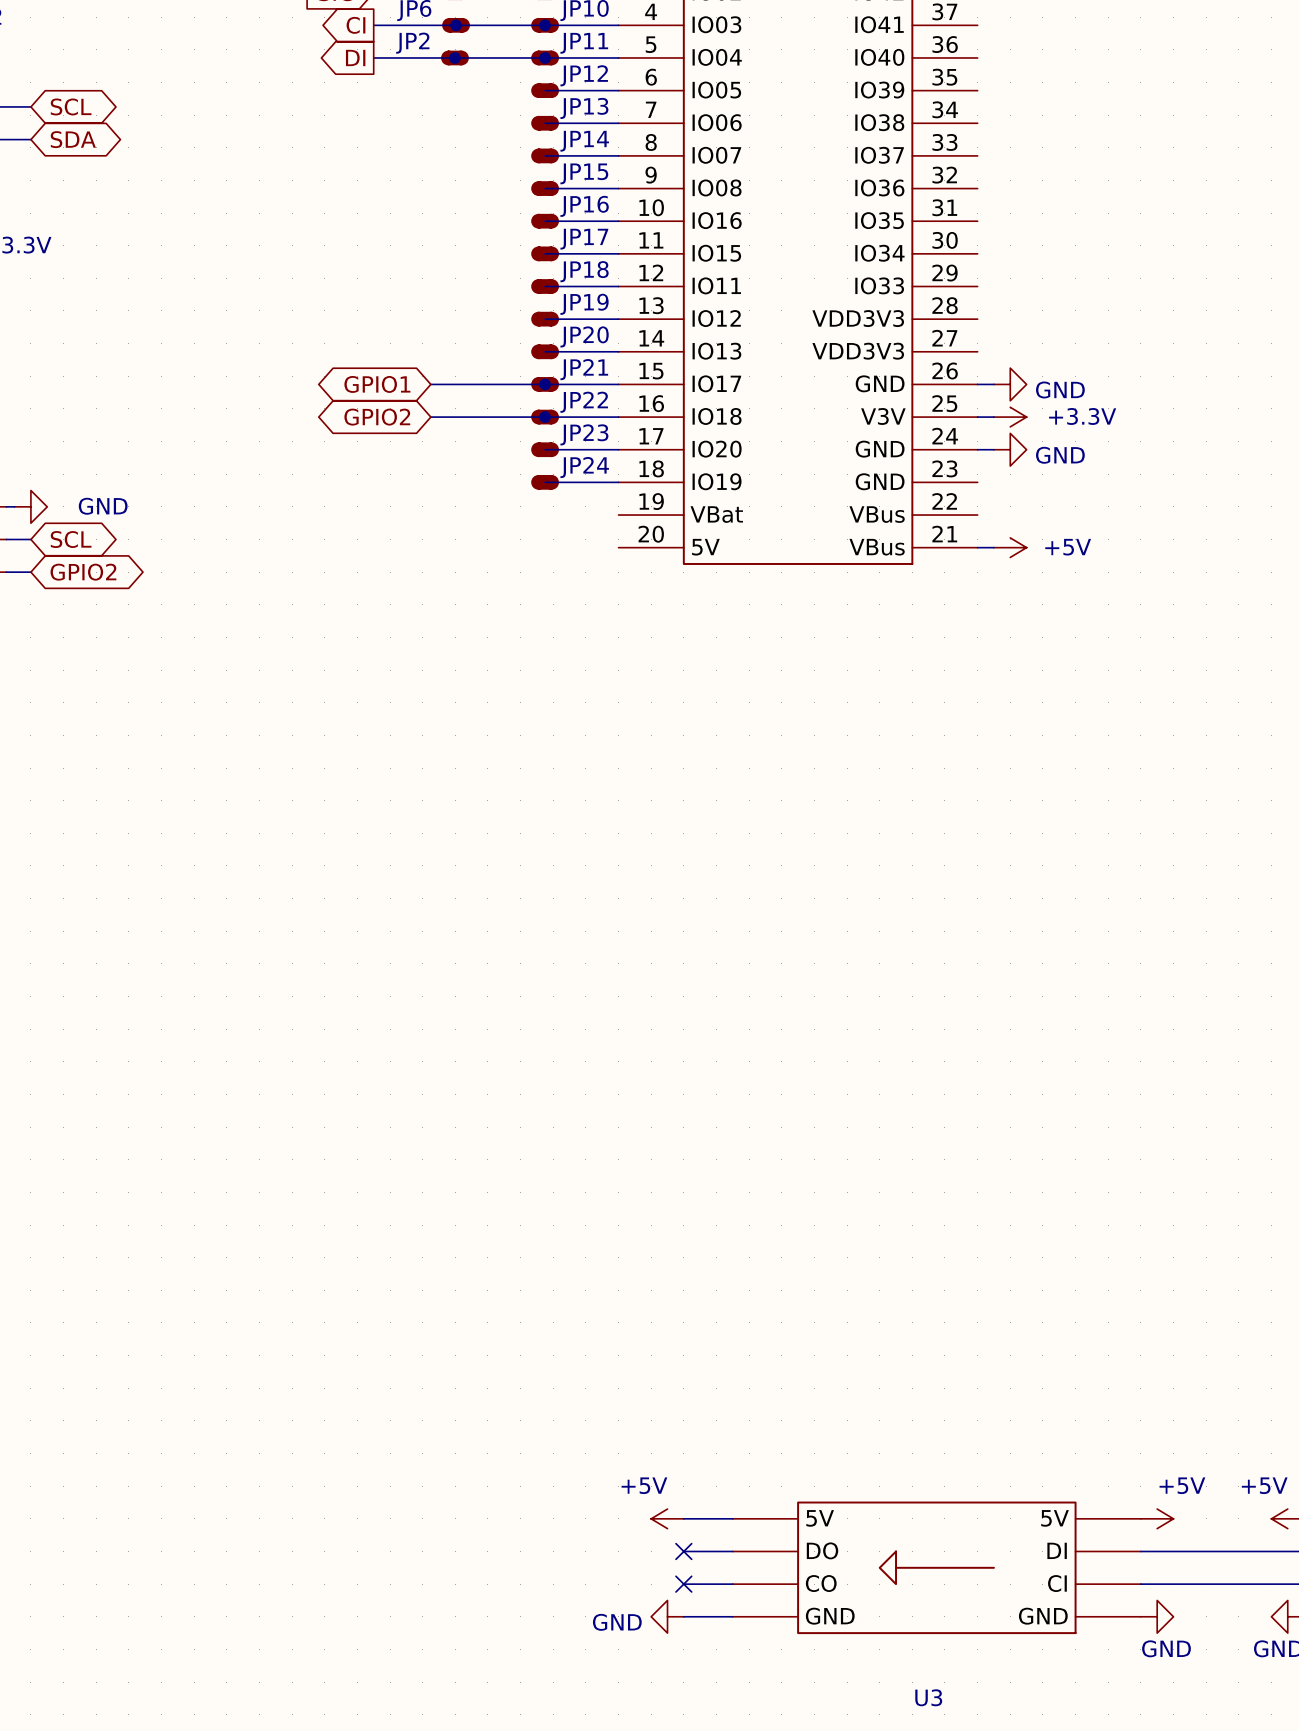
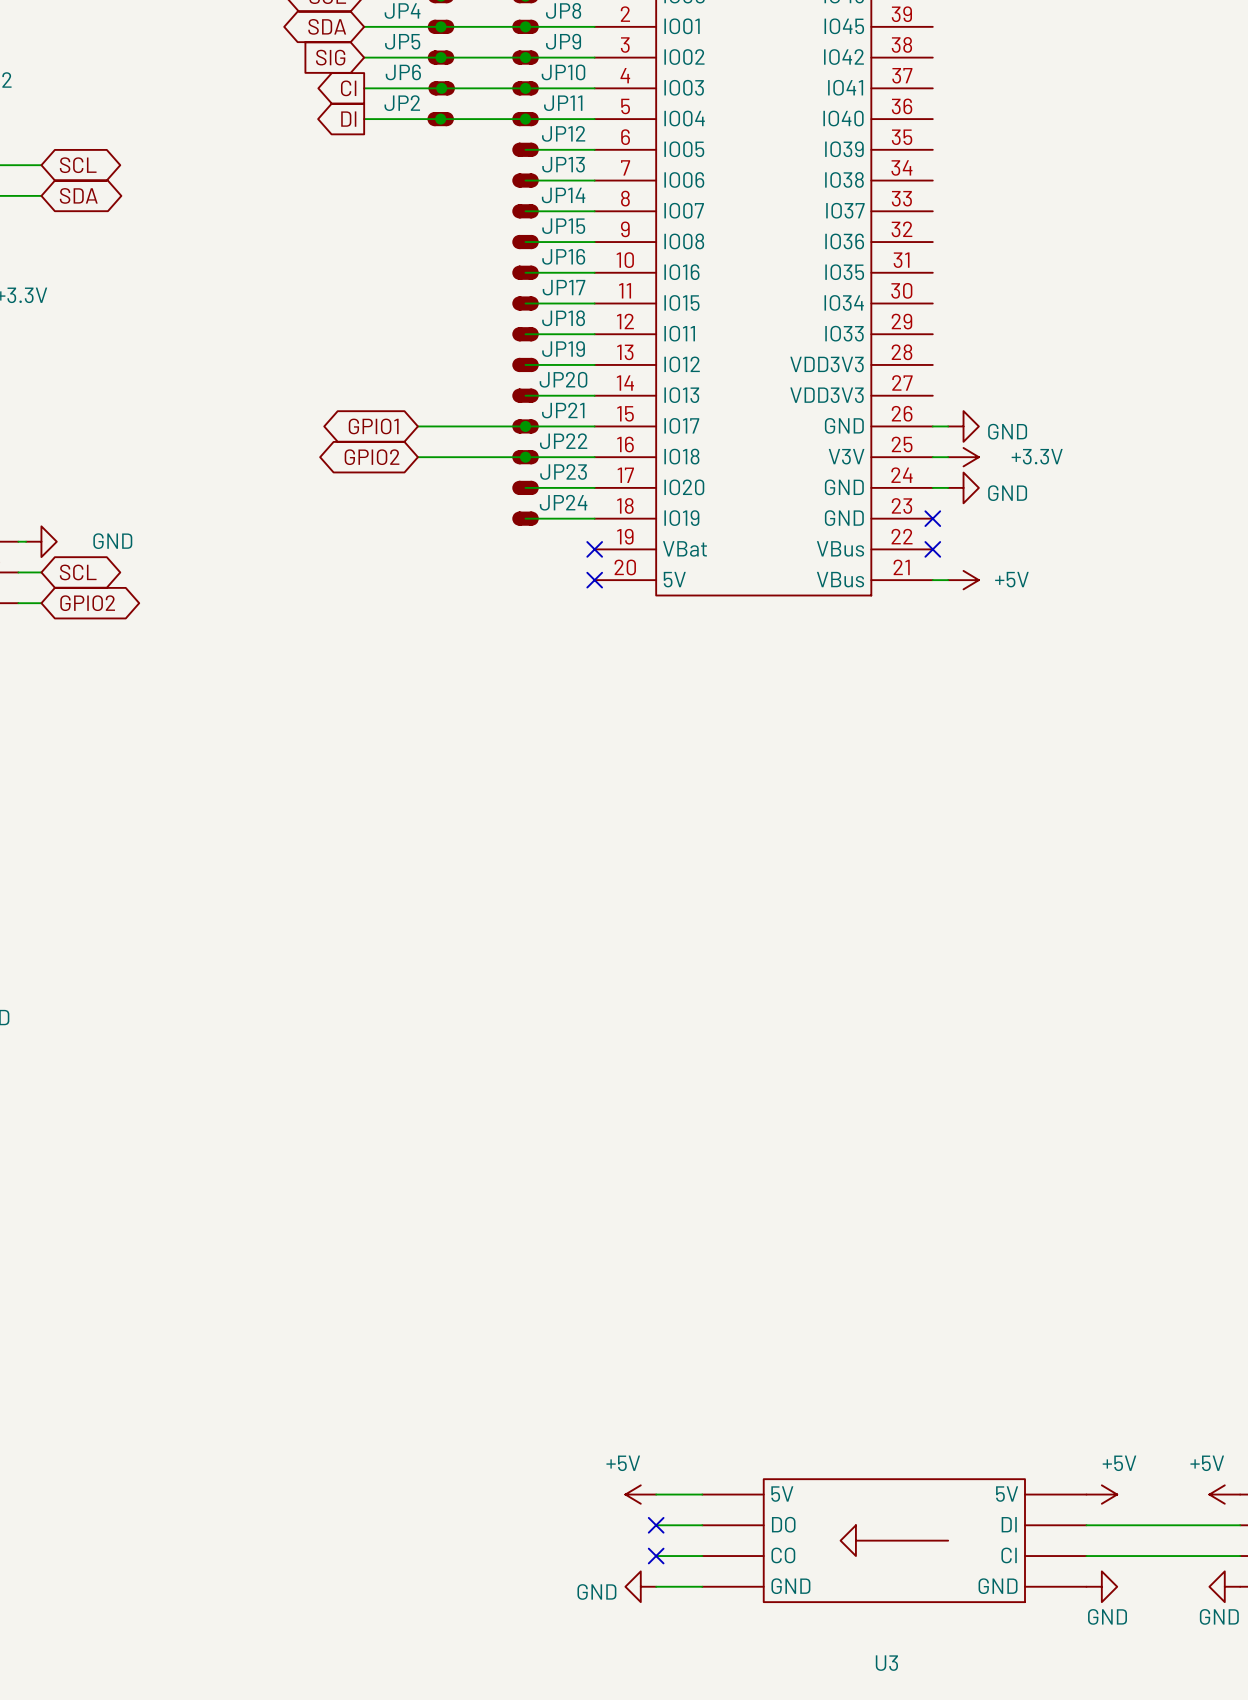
no-connect mark: none -> (932, 518)
no-connect mark: none -> (594, 549)
no-connect mark: none -> (932, 549)
no-connect mark: none -> (594, 580)

